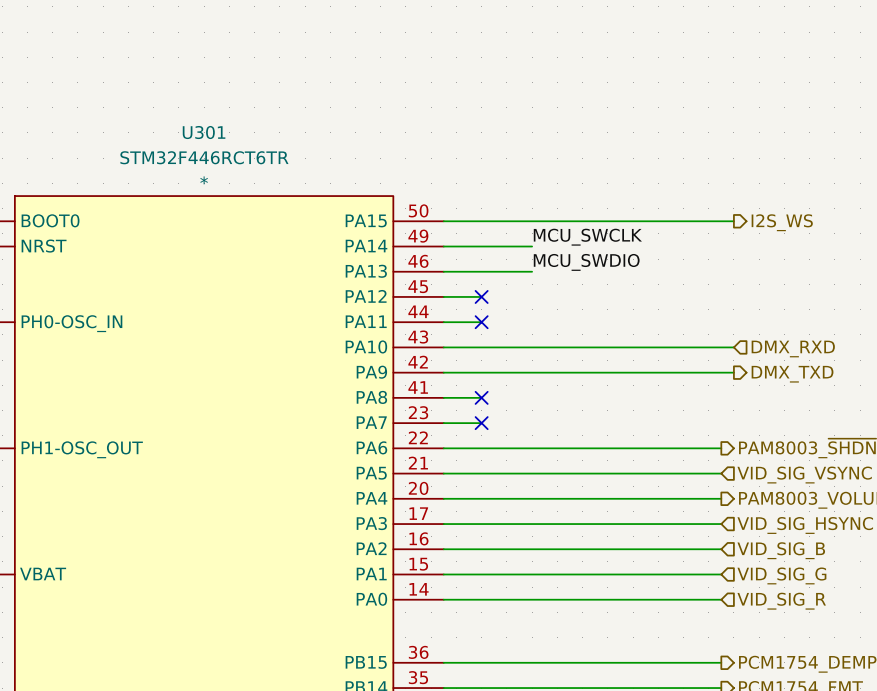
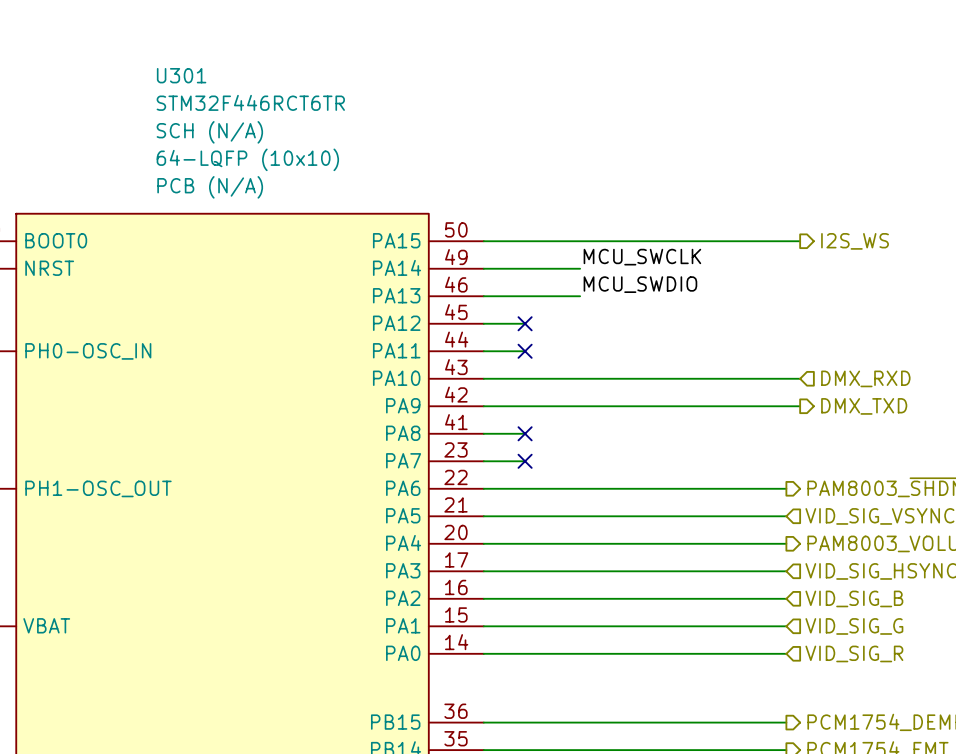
U301 name position: U301 (204, 132) -> U301 (181, 75)
U301 text: none -> 64-LQFP (10x10) (247, 159)
U301 value position: STM32F446RCT6TR (204, 157) -> STM32F446RCT6TR (250, 102)
U301 text: none -> PCB (N/A) (210, 187)
U301 text: * (204, 180) -> SCH (N/A) (209, 132)

